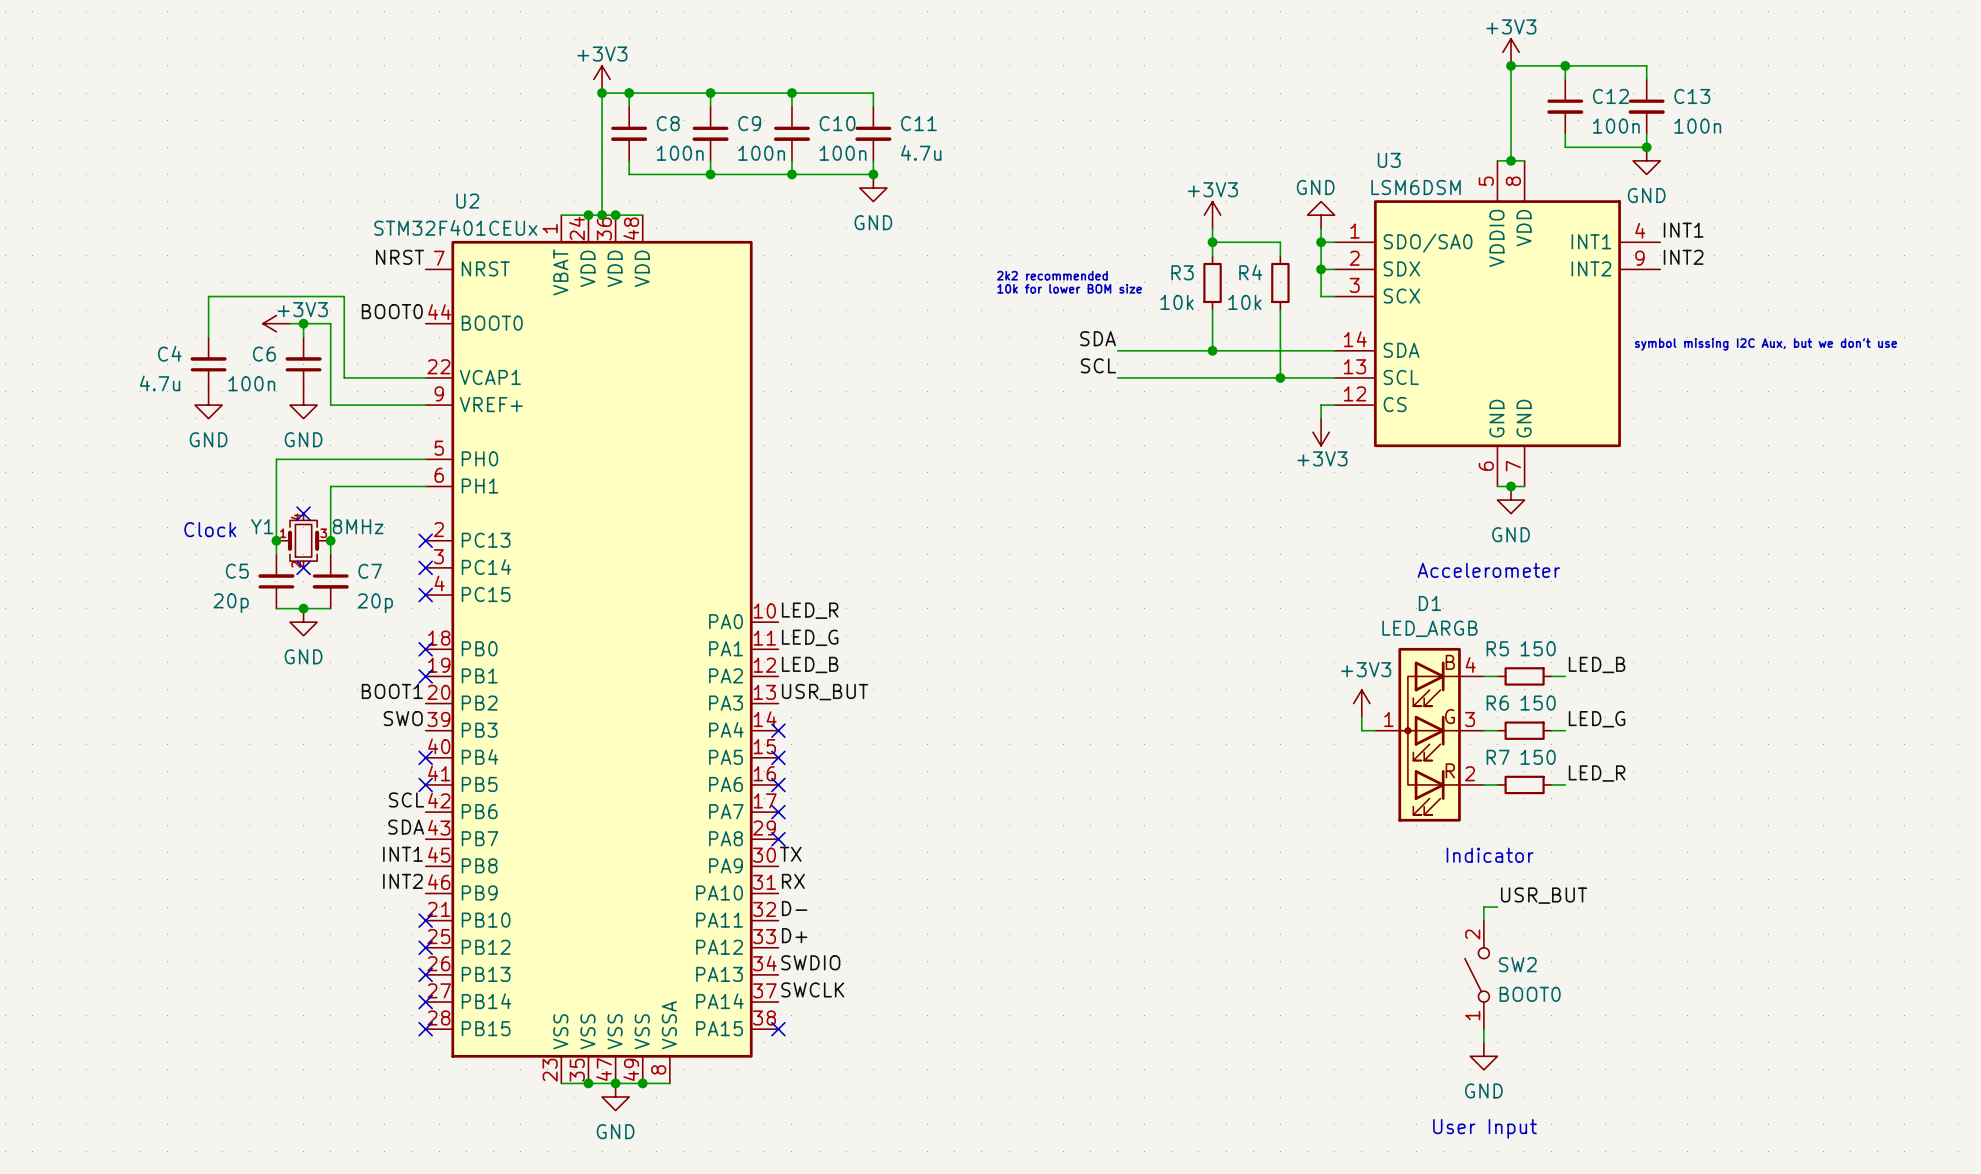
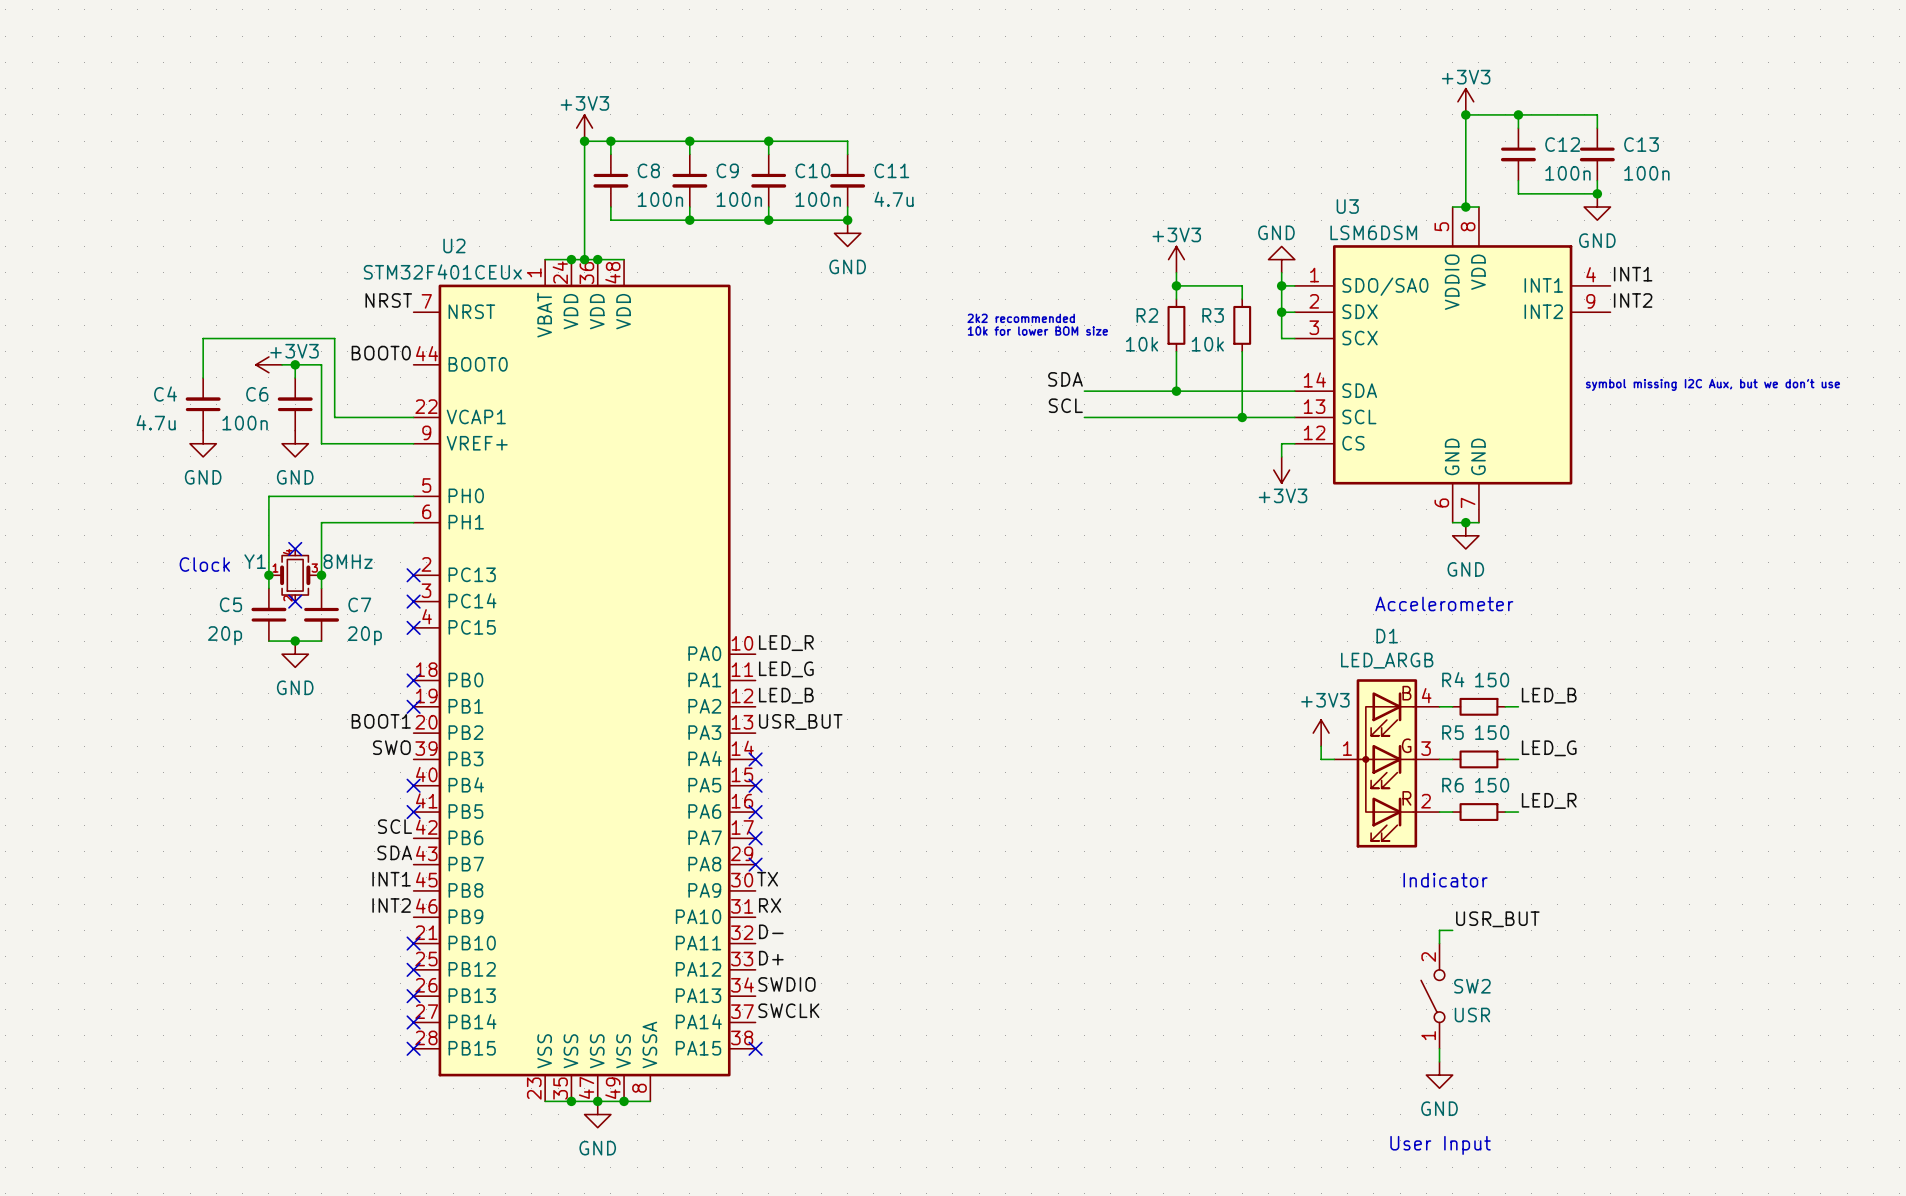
R3 name: R3 (1182, 272) -> R2 (1147, 315)
R4 name: R4 (1250, 272) -> R3 (1213, 315)
R5 name: R5 (1497, 648) -> R4 (1453, 679)
R6 name: R6 (1497, 703) -> R5 (1452, 732)
R7 name: R7 (1498, 757) -> R6 (1452, 785)
SW2 value: BOOT0 (1530, 994) -> USR (1472, 1015)

